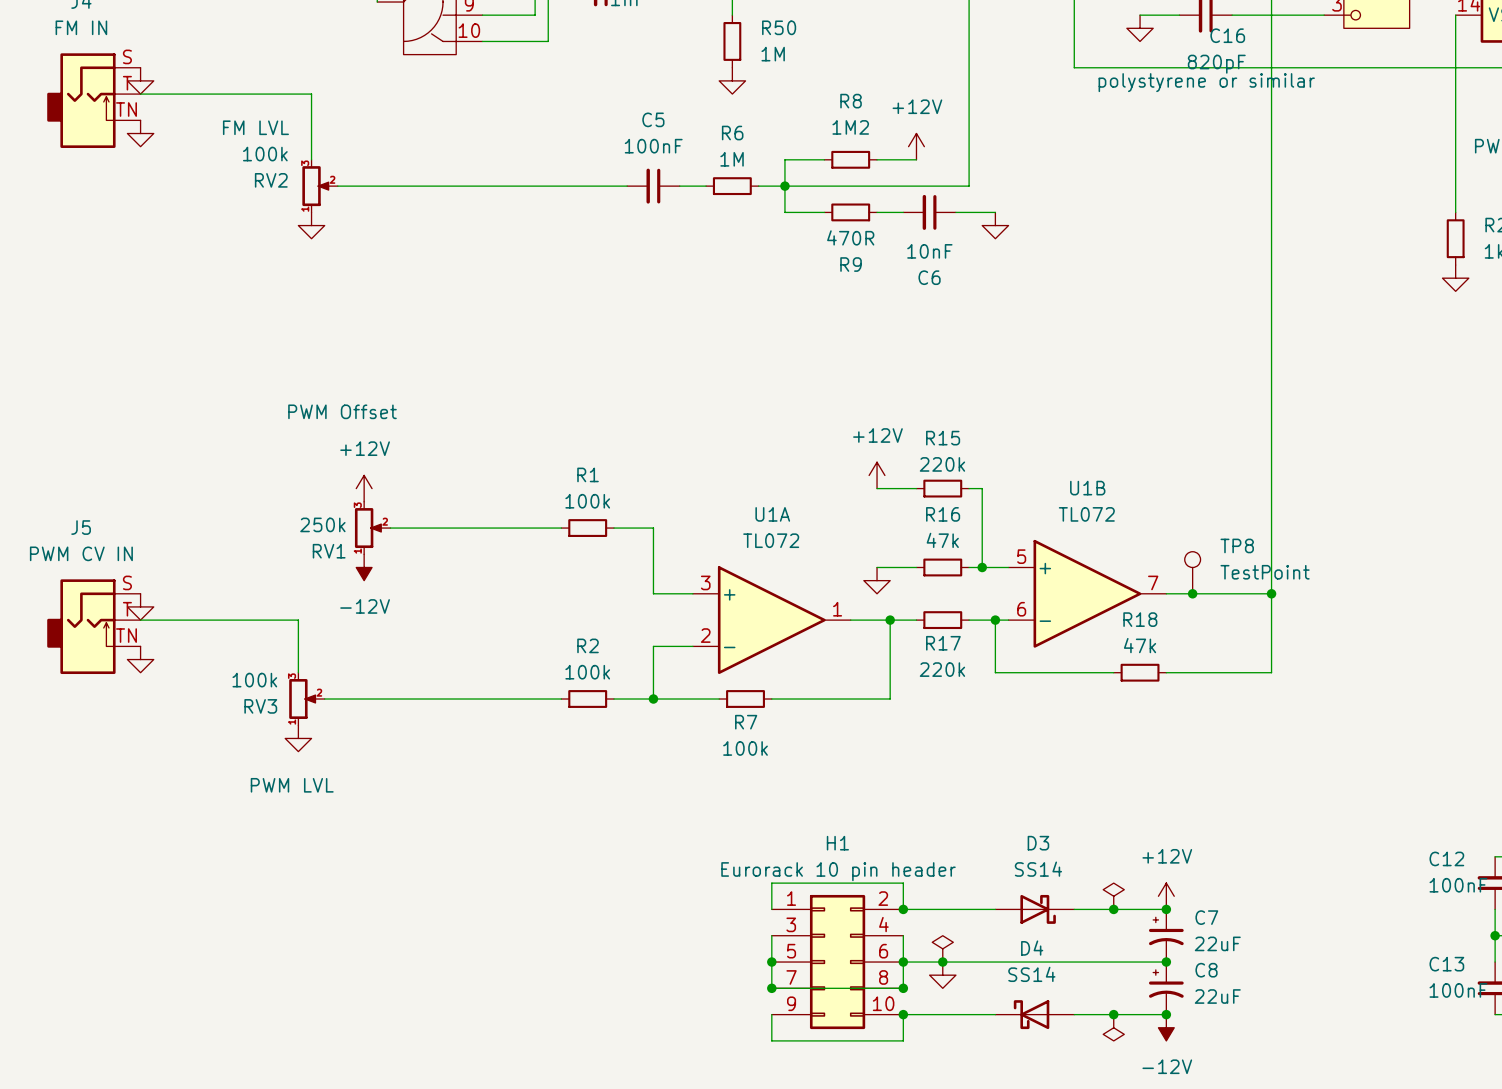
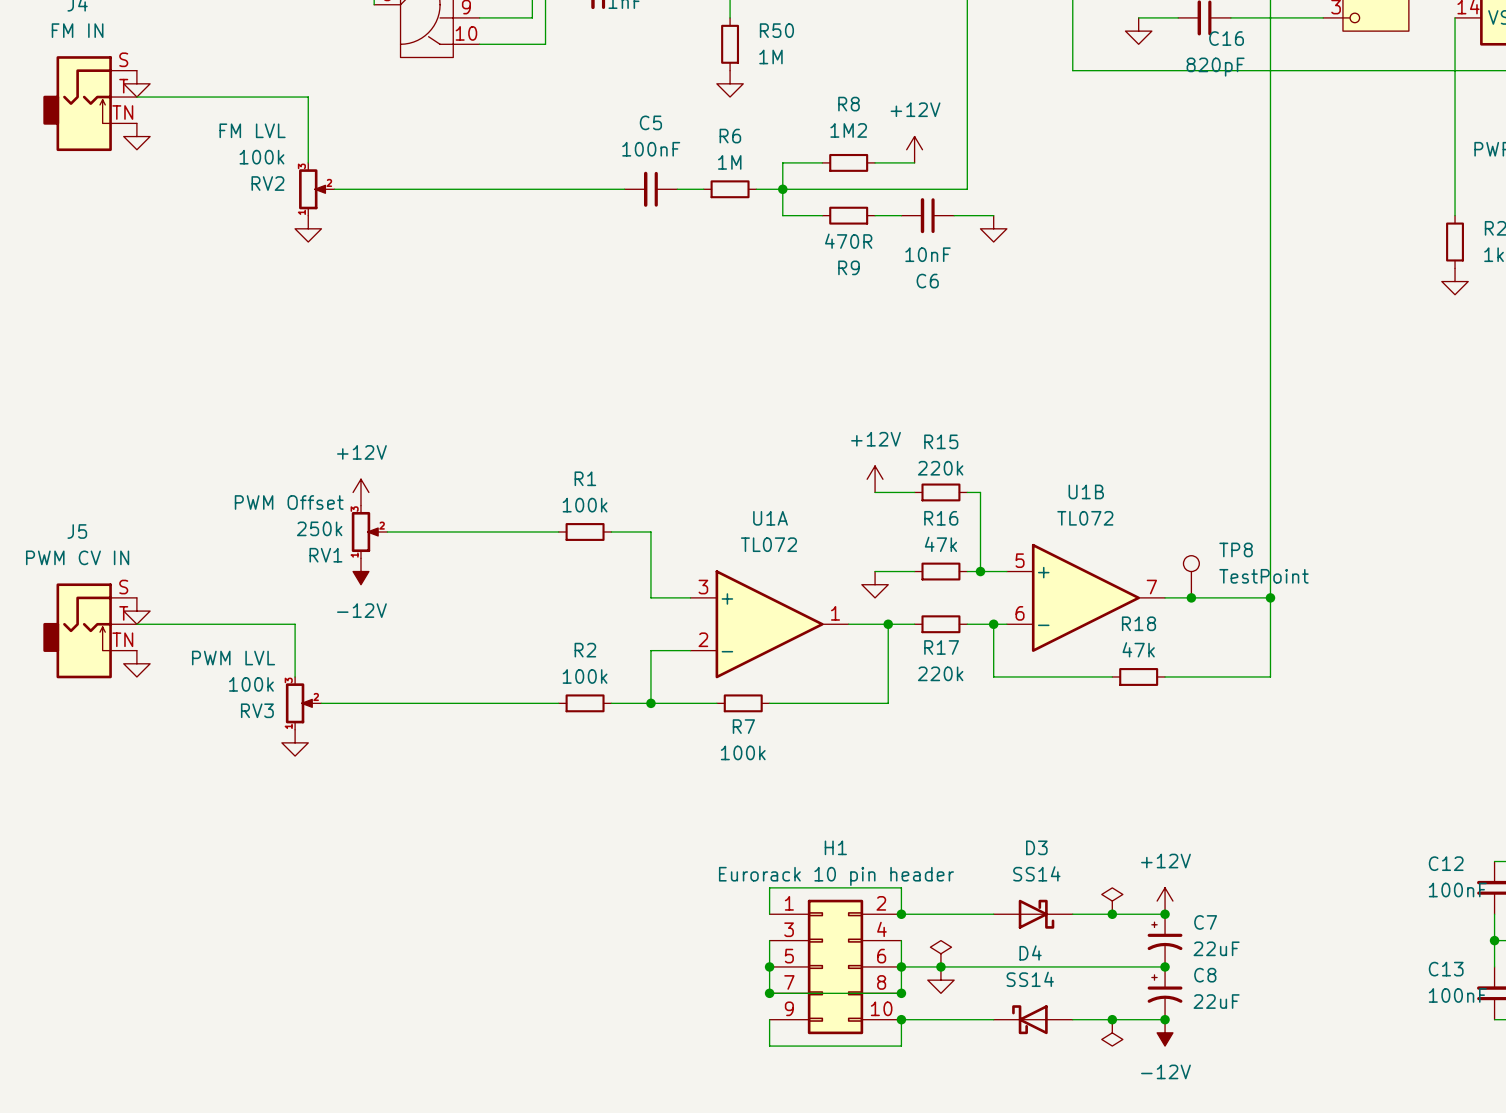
C16 text: polystyrene or similar (1206, 82) -> none
RV1 text position: PWM Offset (342, 411) -> PWM Offset (289, 502)
RV3 text position: PWM LVL (292, 785) -> PWM LVL (233, 658)

